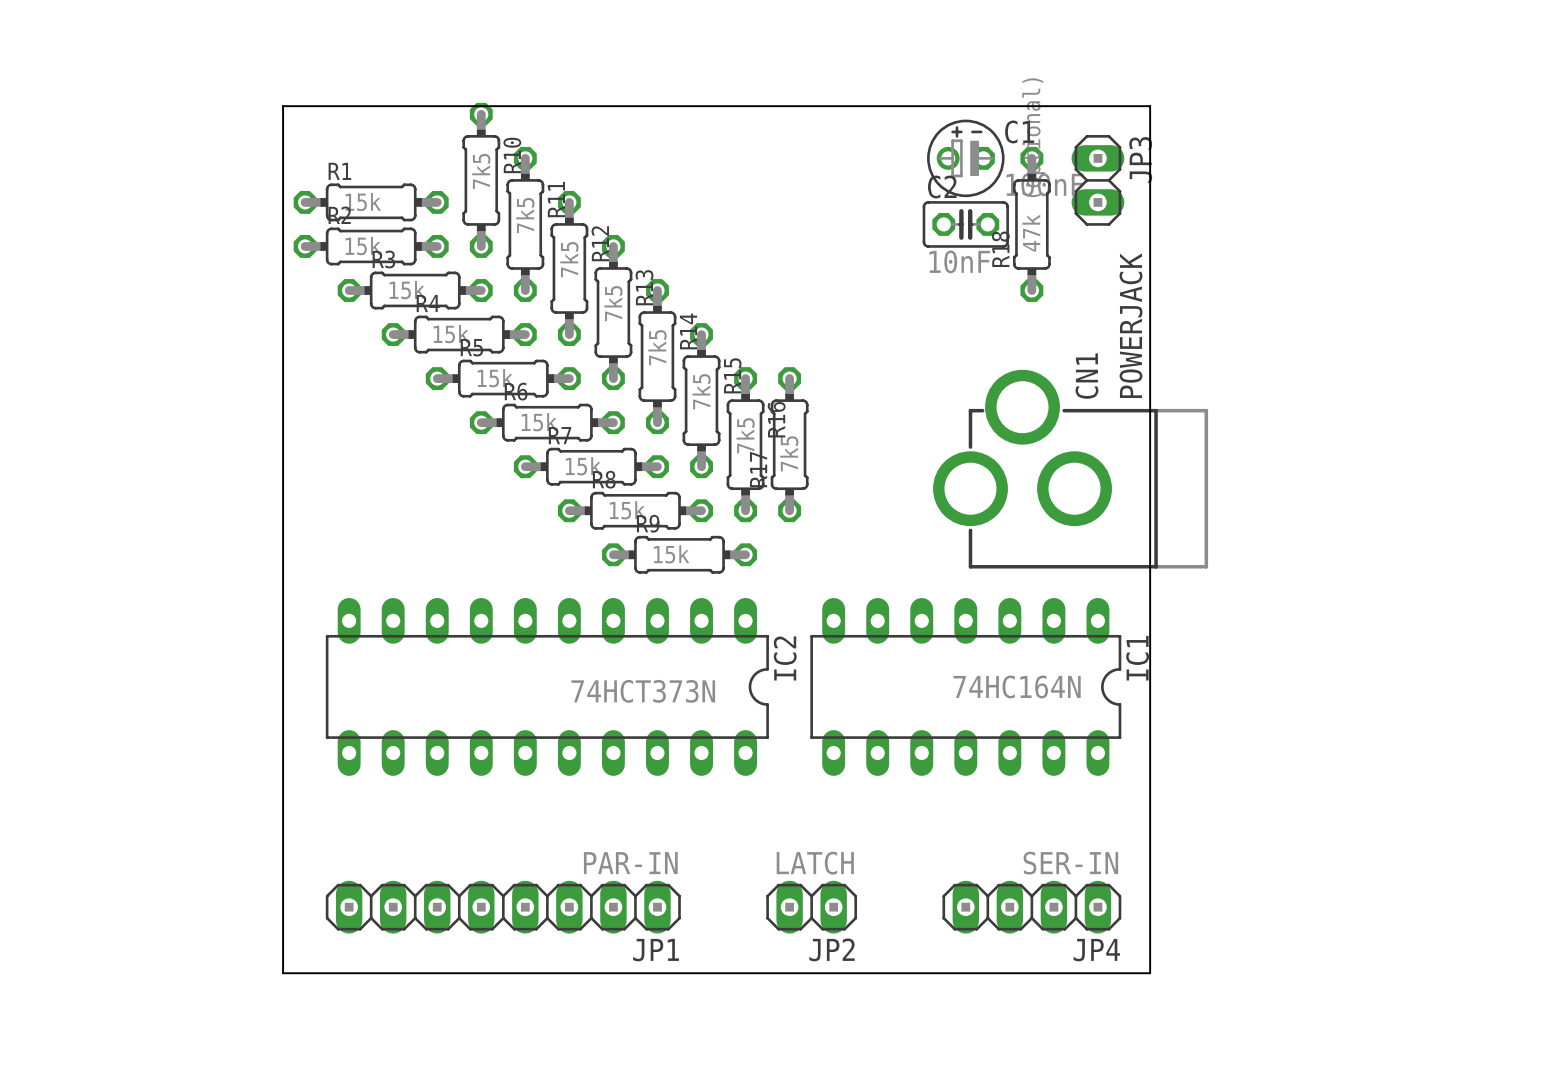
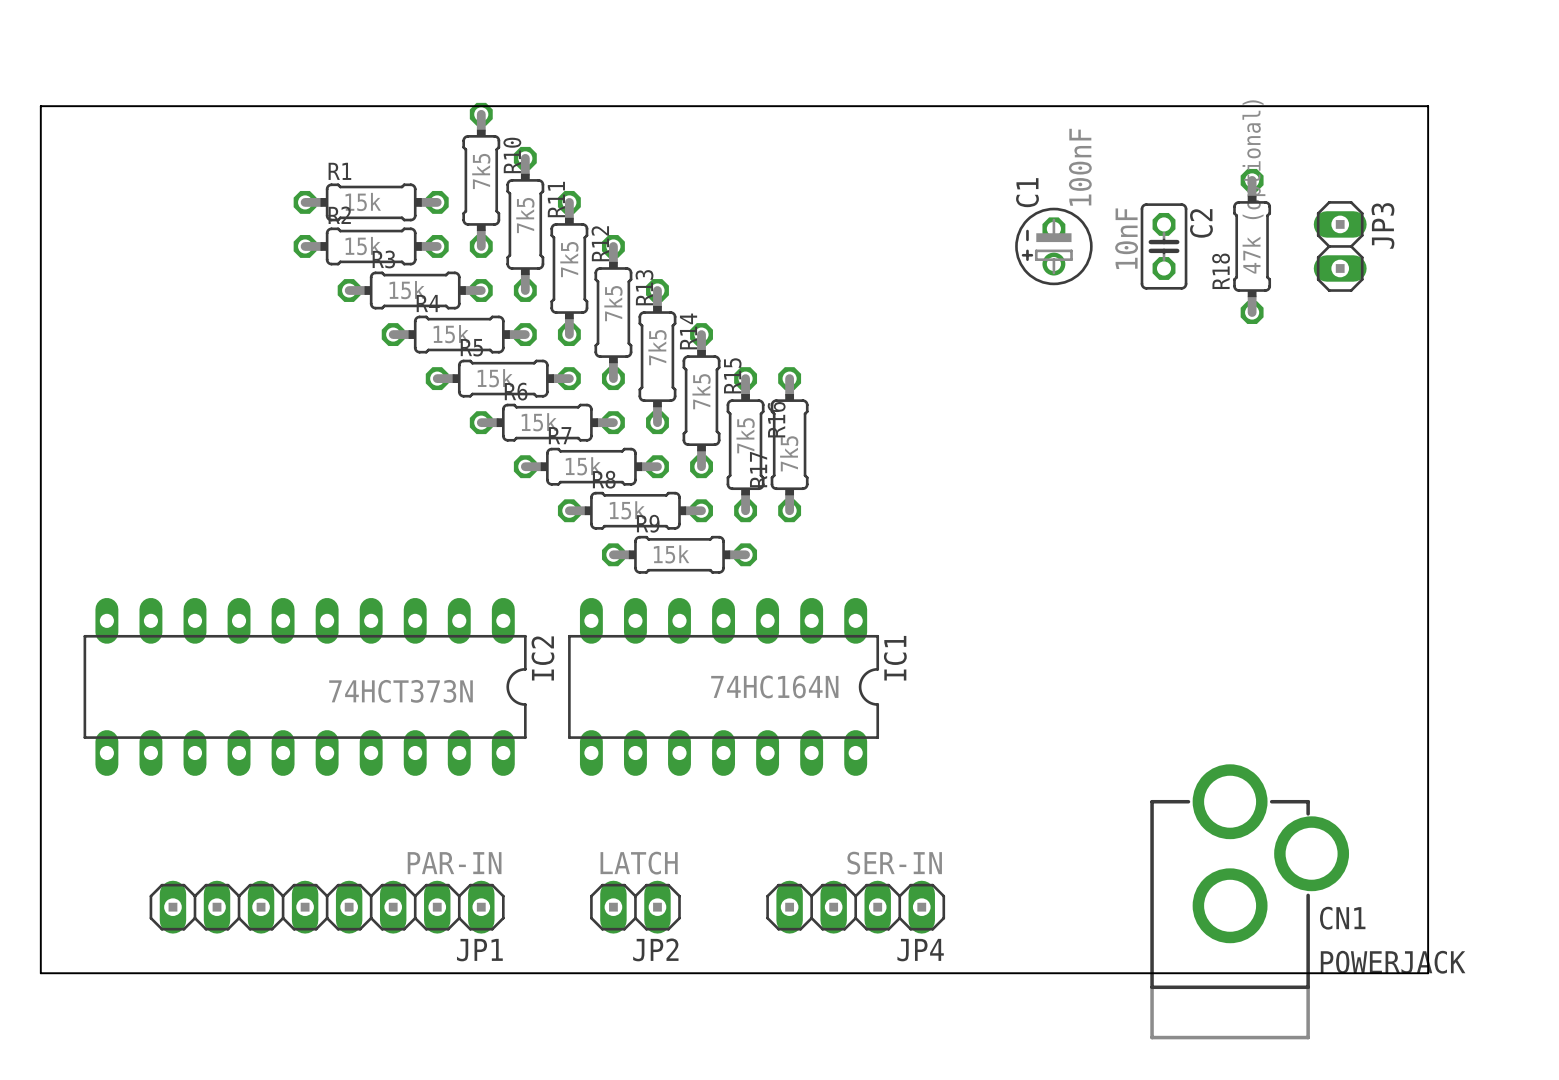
board edge: (283, 106) (283, 973) -> (283, 106) (40, 106) (40, 973) (283, 973)
board edge: (1150, 106) (1150, 973) -> (1150, 106) (1428, 106) (1428, 973) (1150, 973)
C1 rotation: 0° (965, 158) -> 90° counterclockwise (1053, 246)
C1 position: (965, 158) -> (1053, 246)
JP3 position: (1097, 180) -> (1340, 246)
C2 rotation: 0° (965, 224) -> 90° clockwise (1164, 246)
C2 position: (965, 224) -> (1164, 246)
R18 position: (1031, 224) -> (1252, 246)
CN1 rotation: 0° (1070, 469) -> 90° clockwise (1249, 901)
CN1 position: (1070, 469) -> (1249, 901)
IC2 position: (547, 686) -> (305, 686)
IC1 position: (965, 686) -> (723, 686)
JP1 position: (503, 907) -> (327, 907)
JP2 position: (811, 907) -> (635, 907)
JP4 position: (1031, 907) -> (855, 907)

